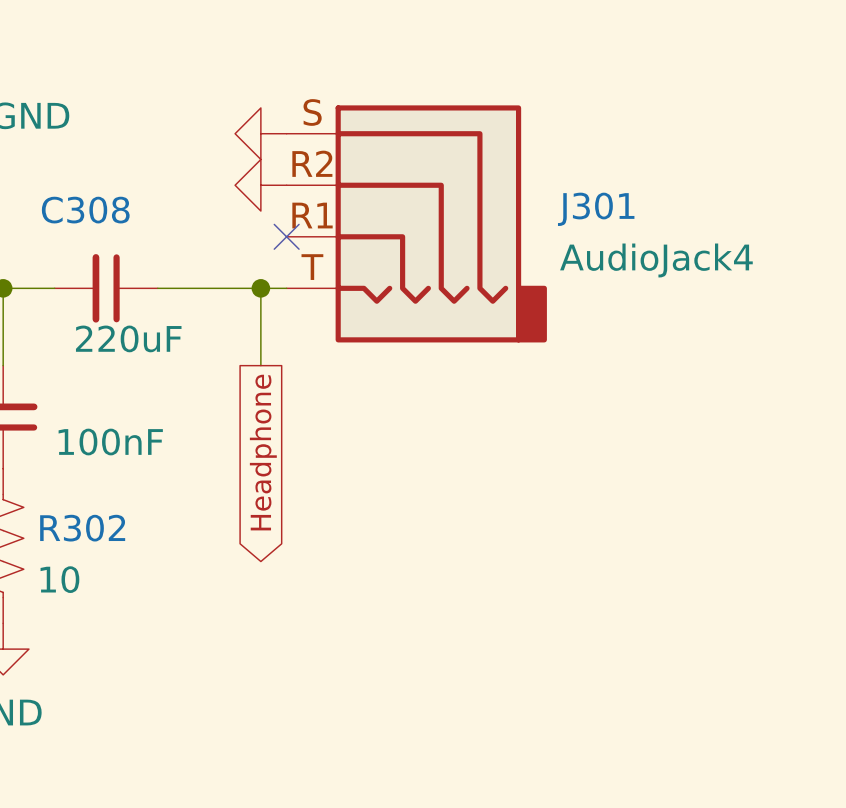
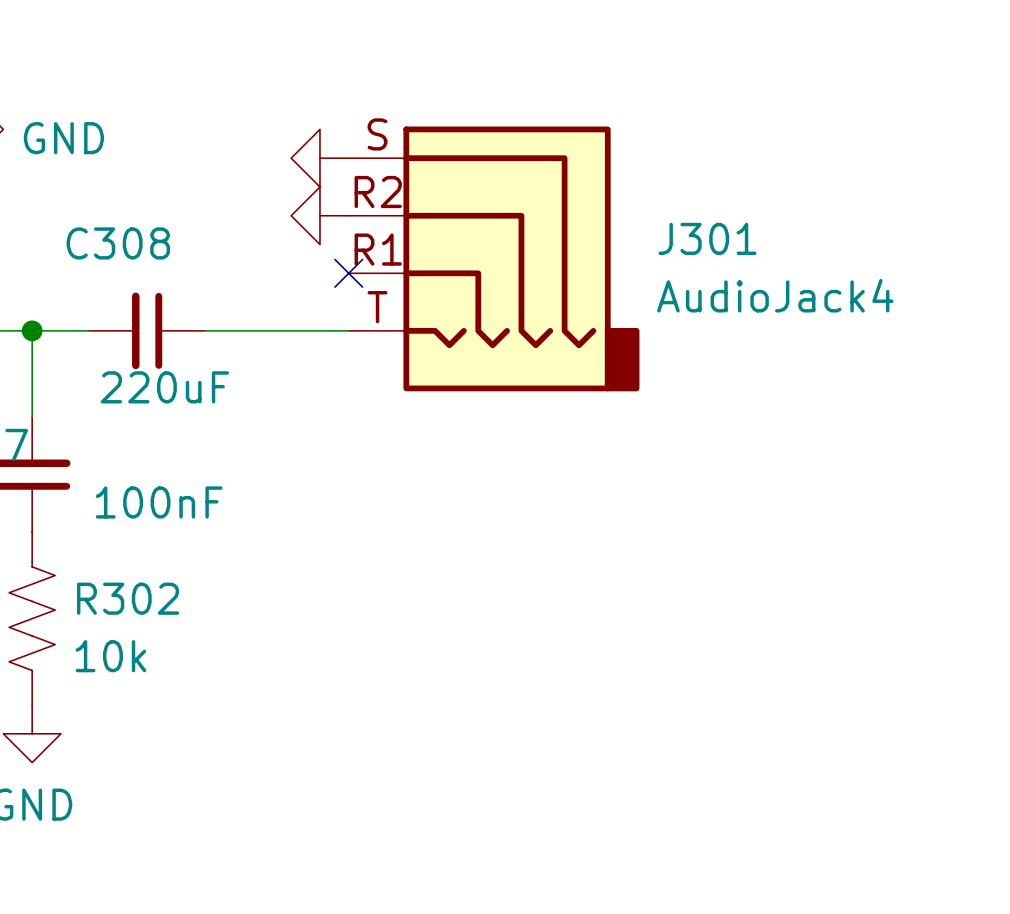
wire: (260, 288) (260, 365) -> none
junction: (260, 288) -> none
global label: Headphone (263, 452) -> none
R302 value: 10 (59, 579) -> 10k (110, 656)

